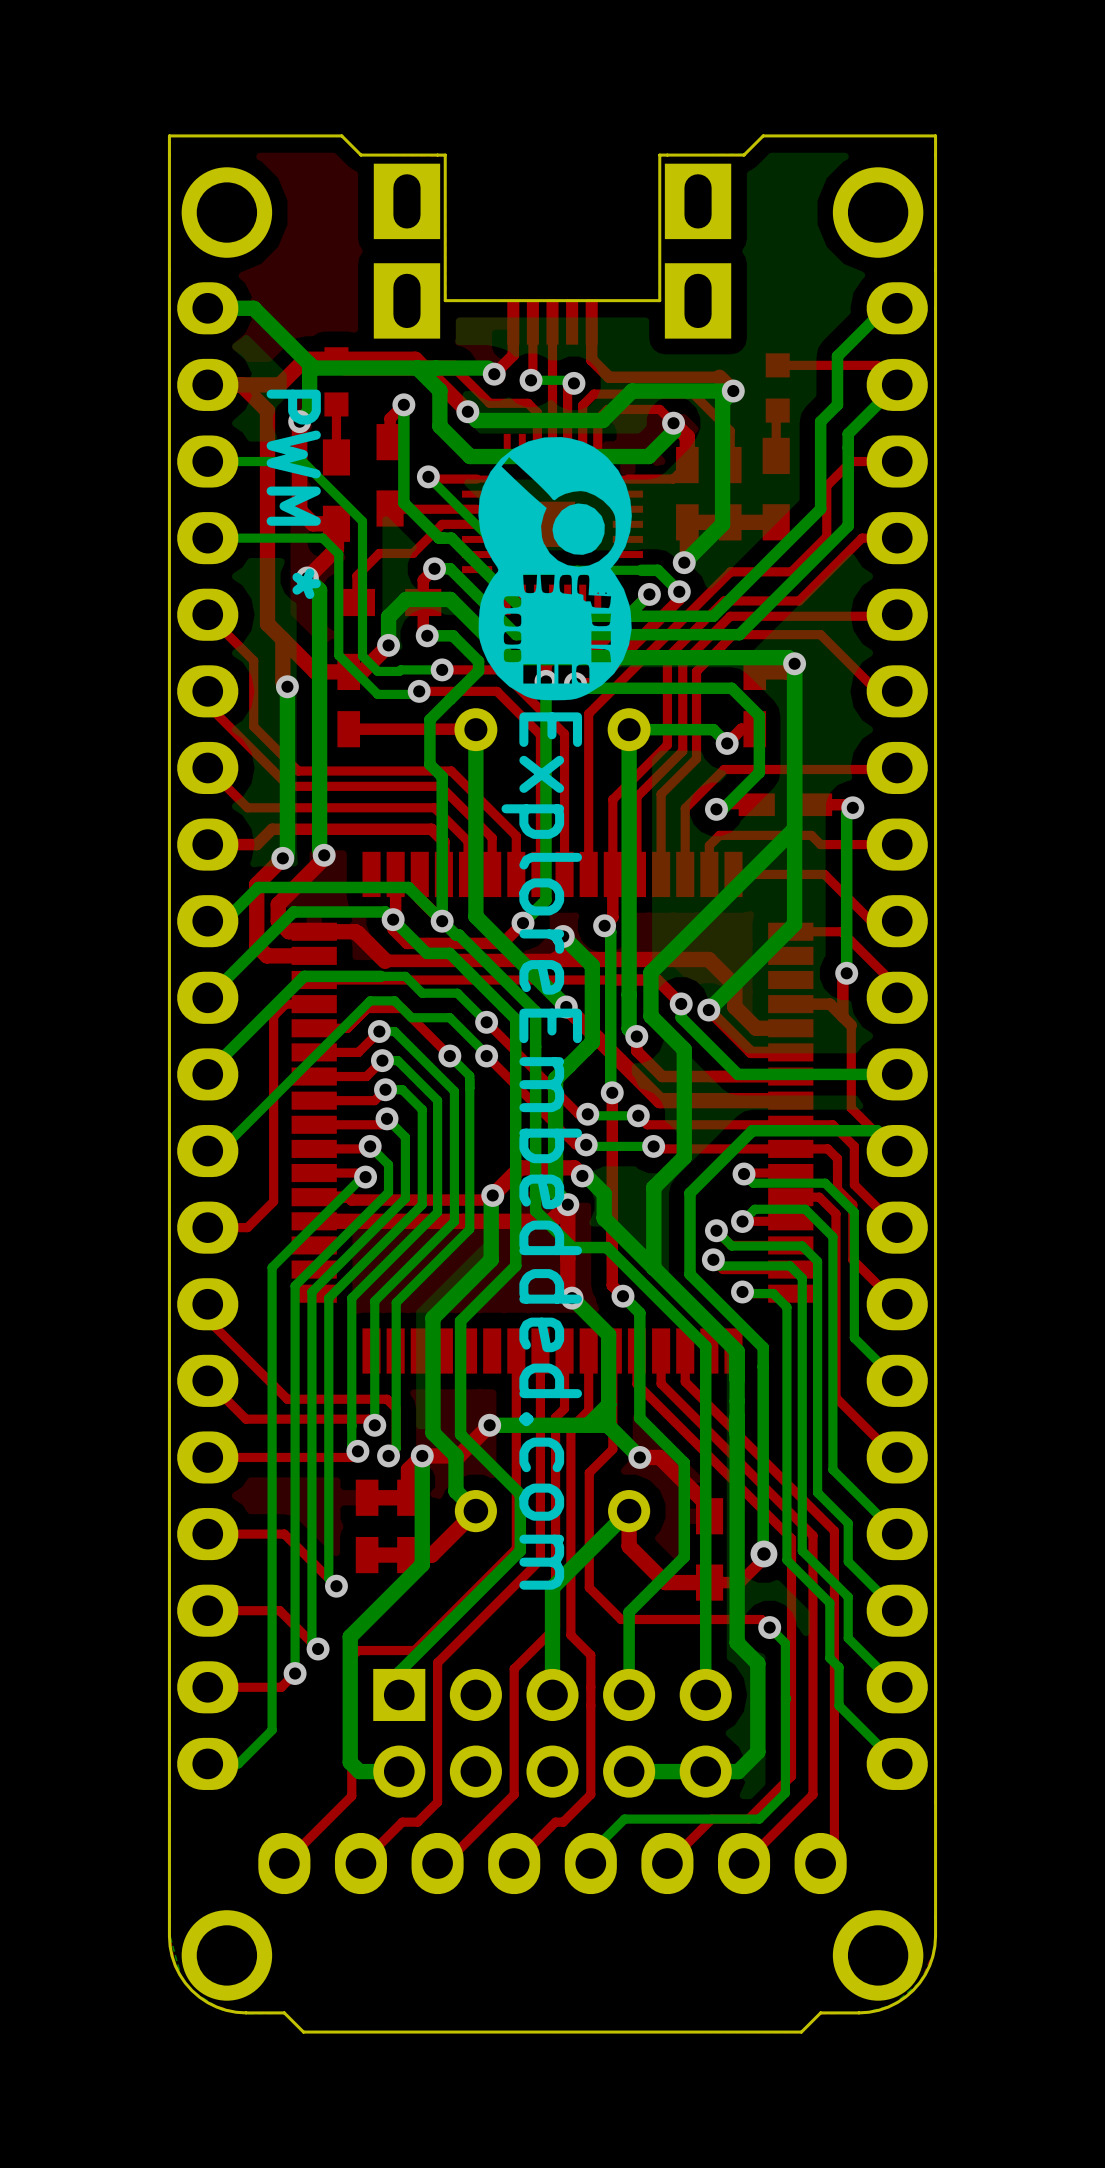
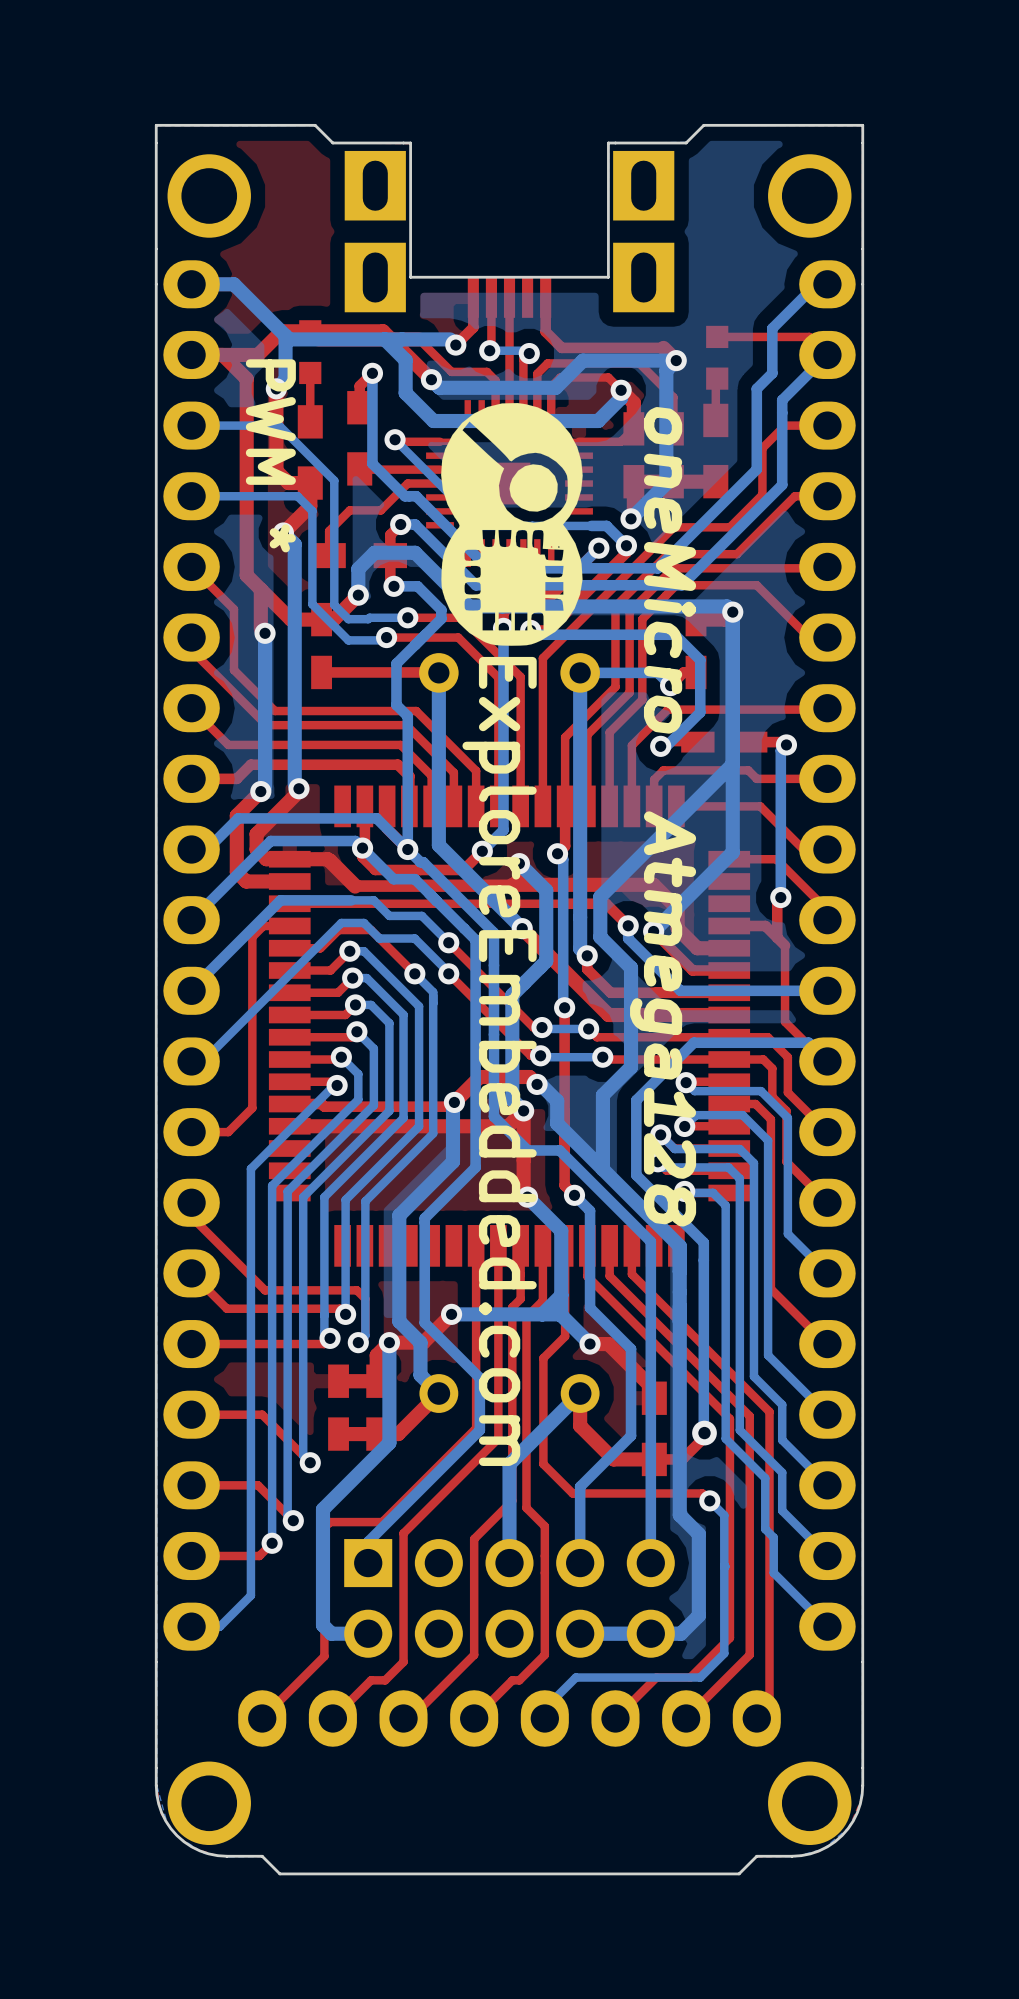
text: none -> oneMicro Atmega128 (663, 816)

